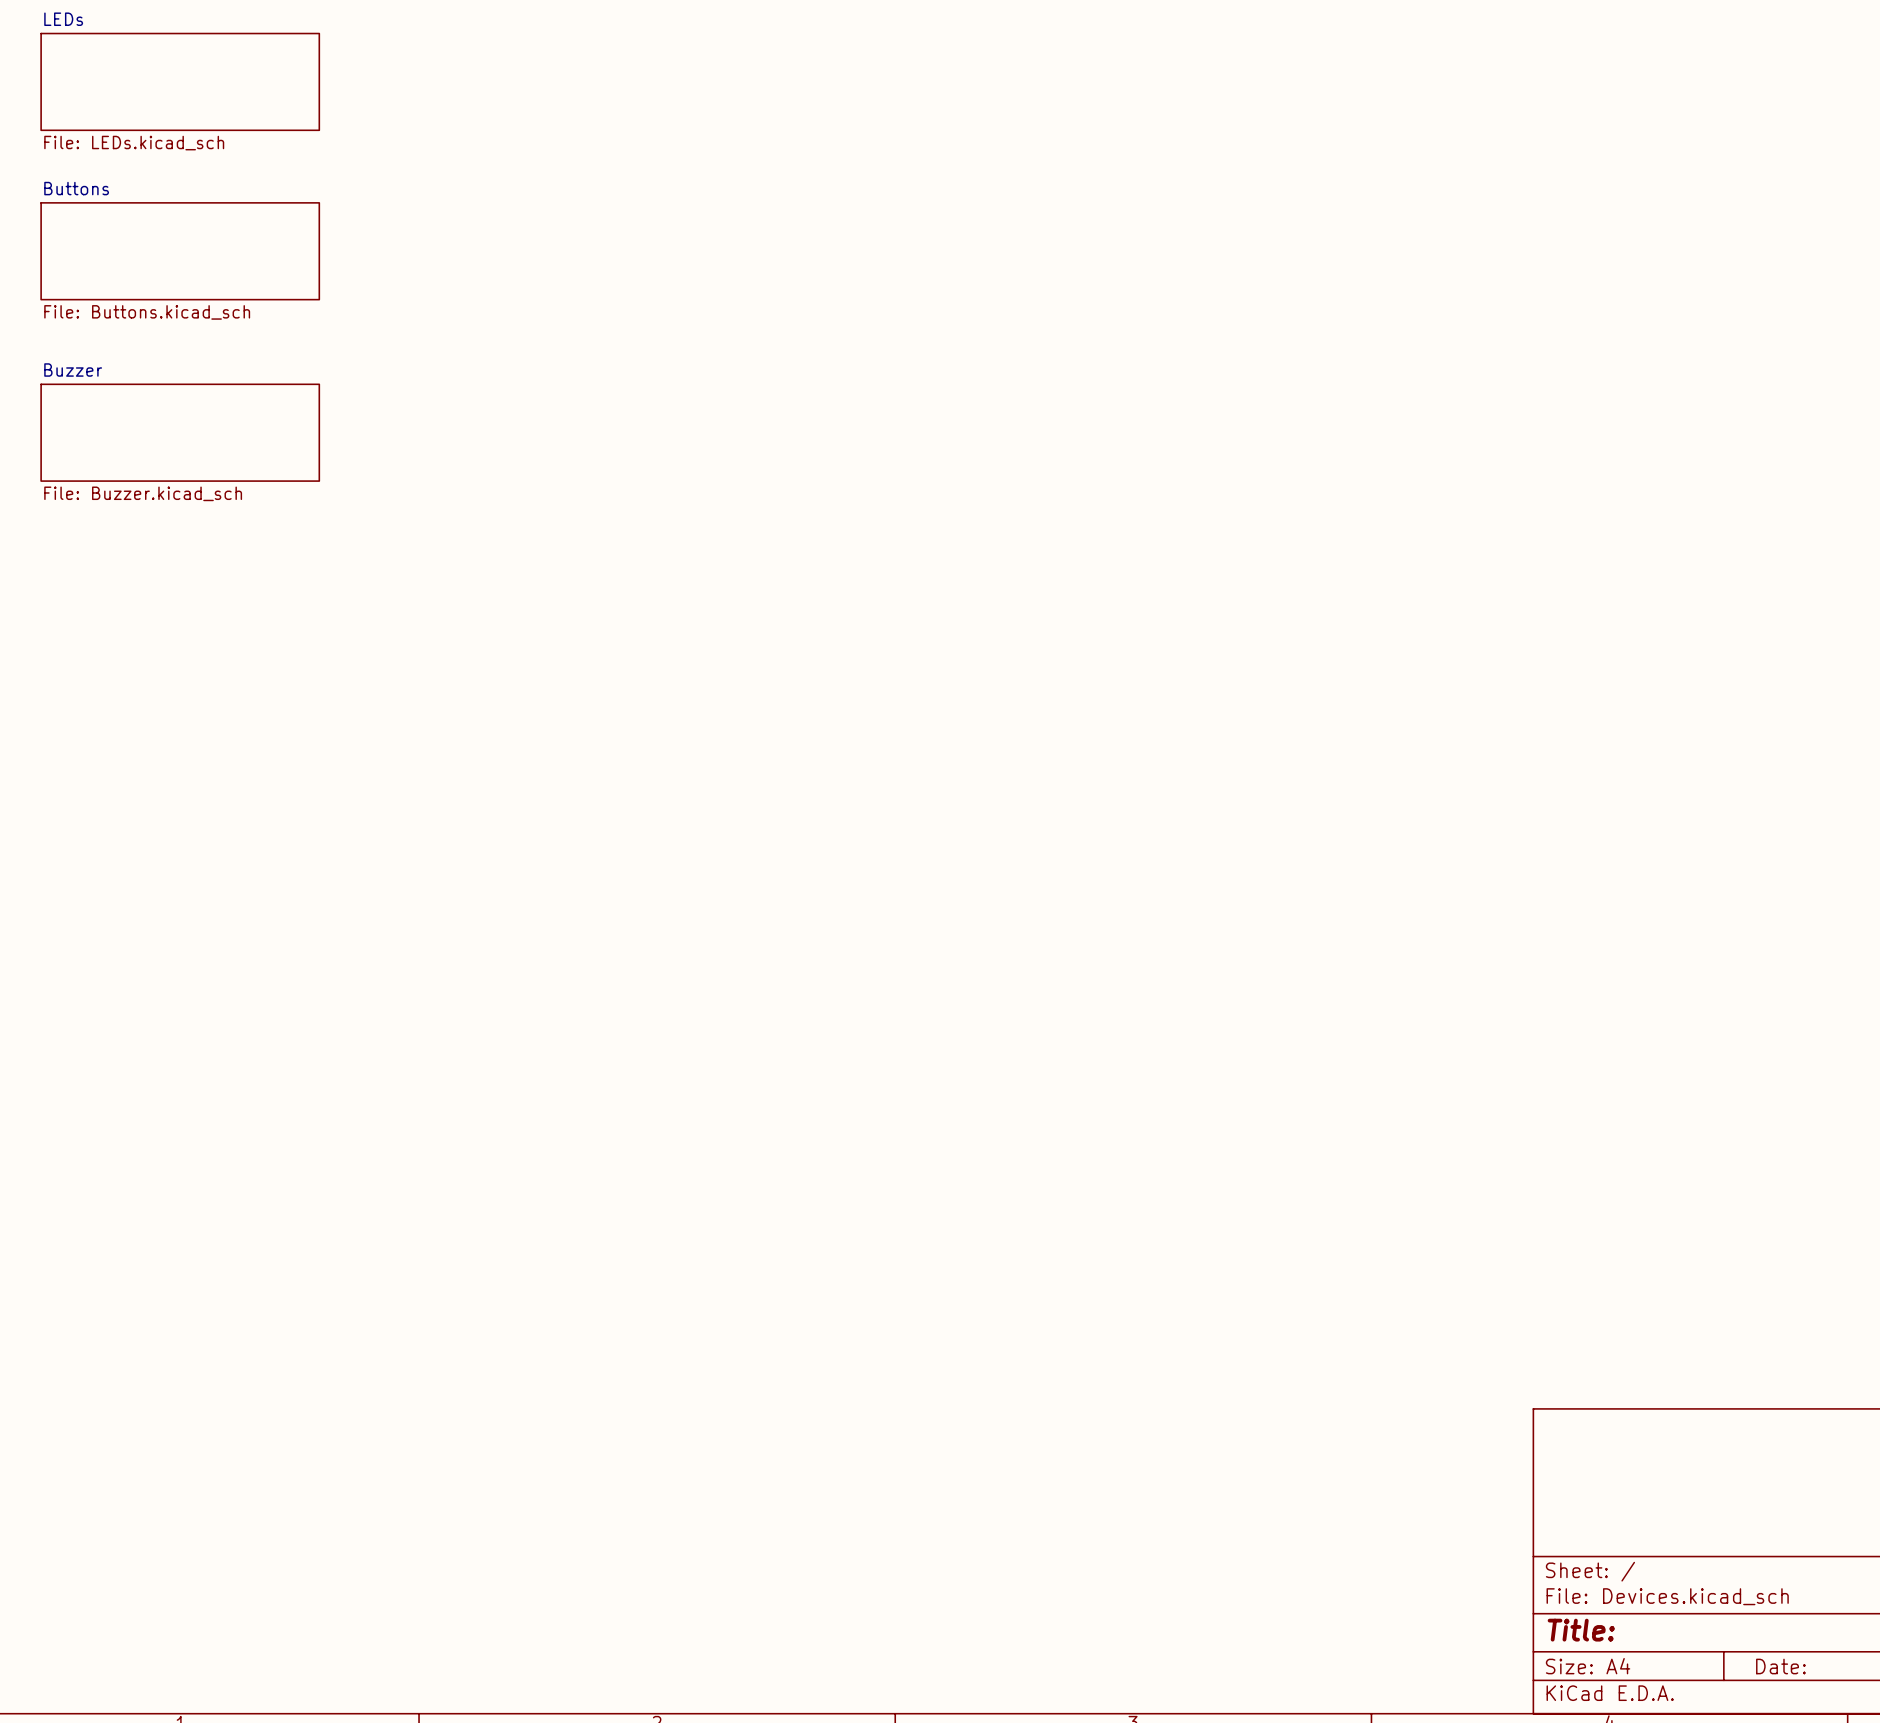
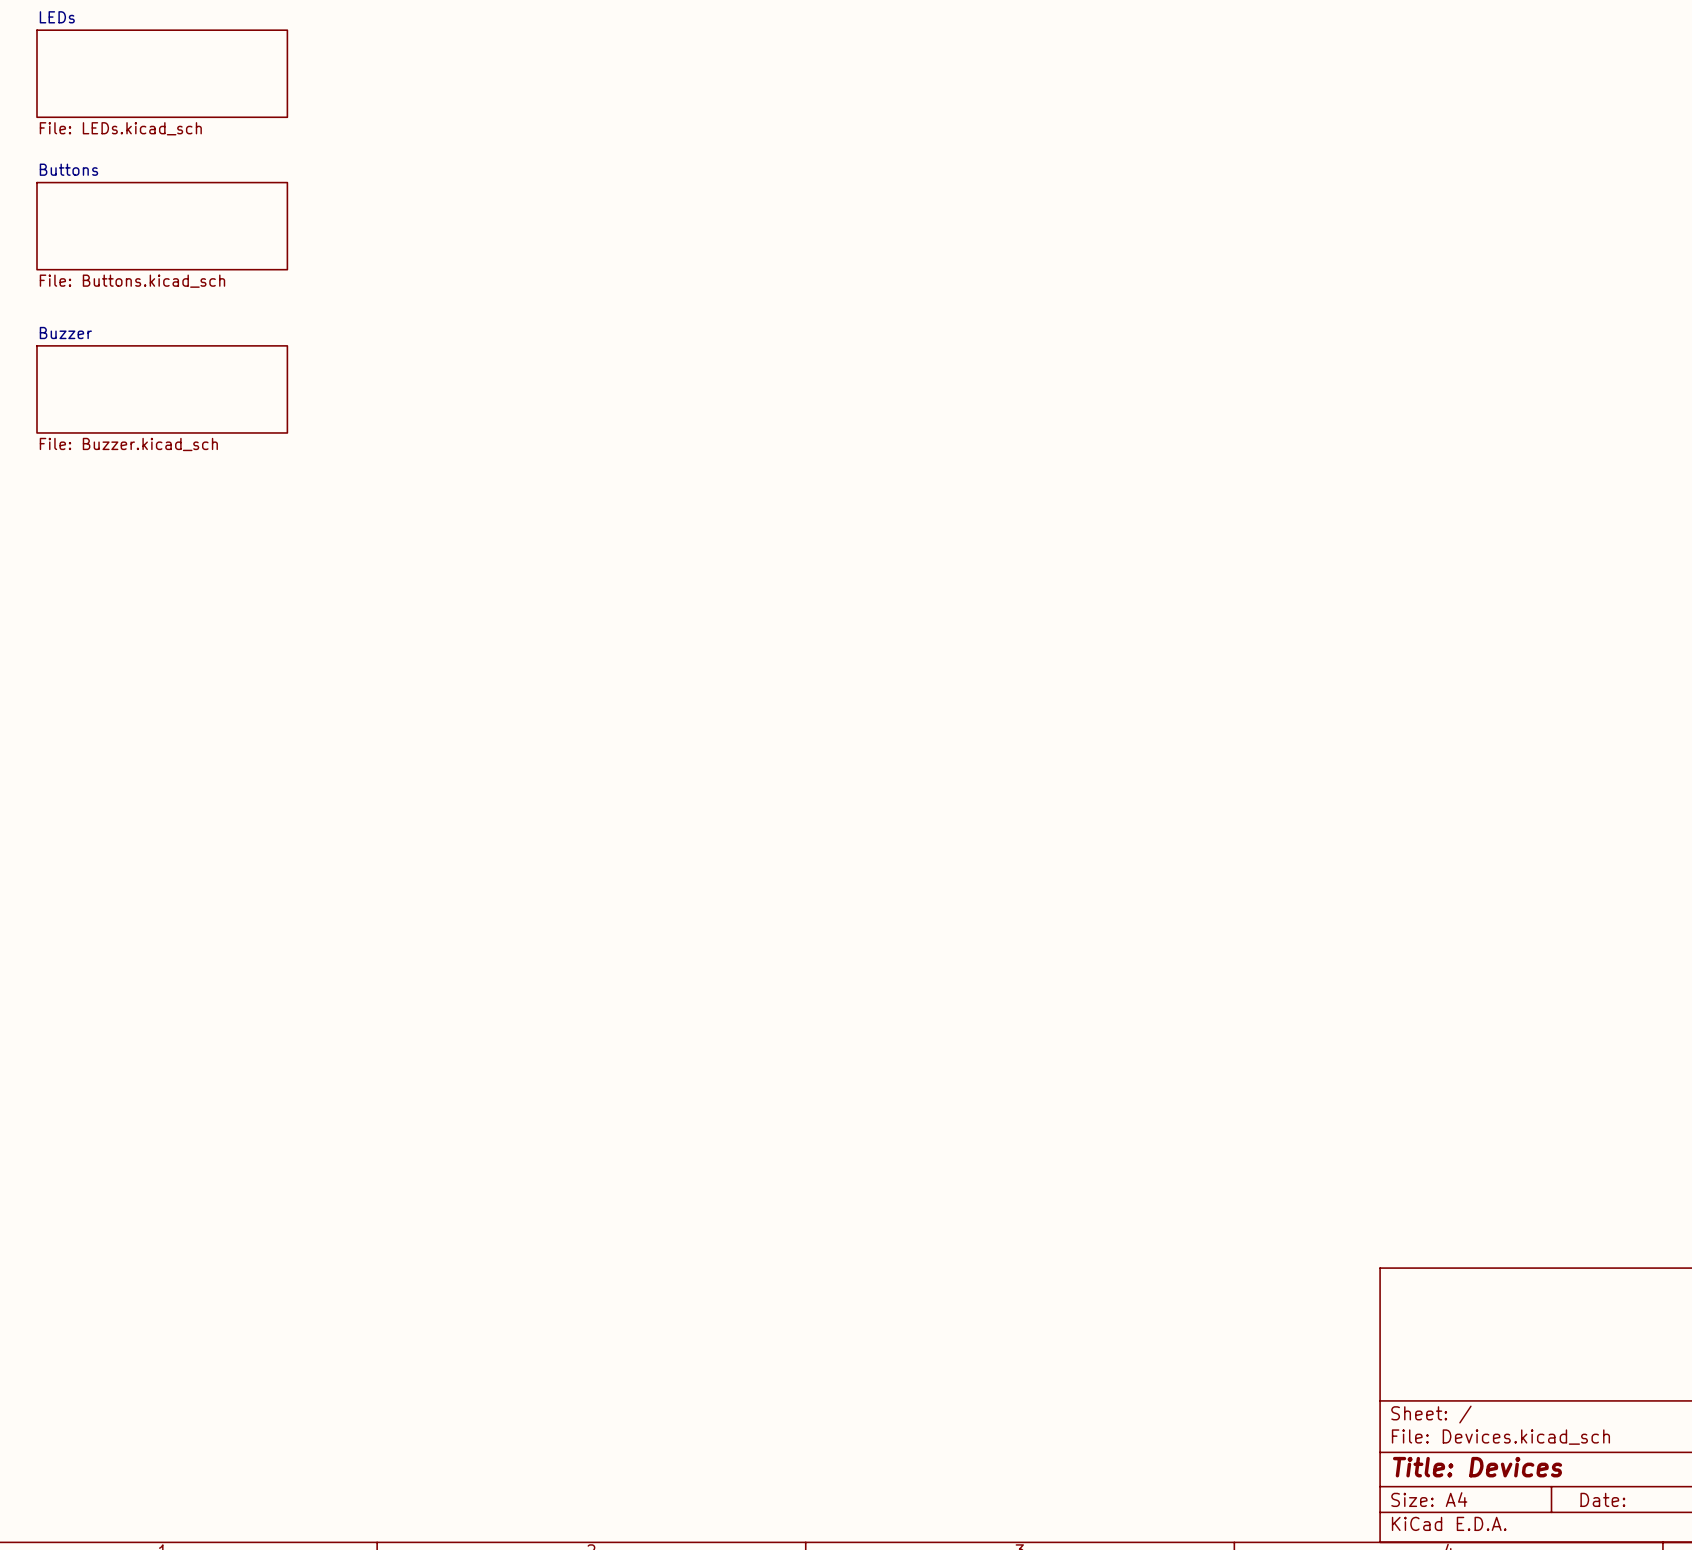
title block: Title: (1581, 1630) -> Title: Devices (1477, 1467)

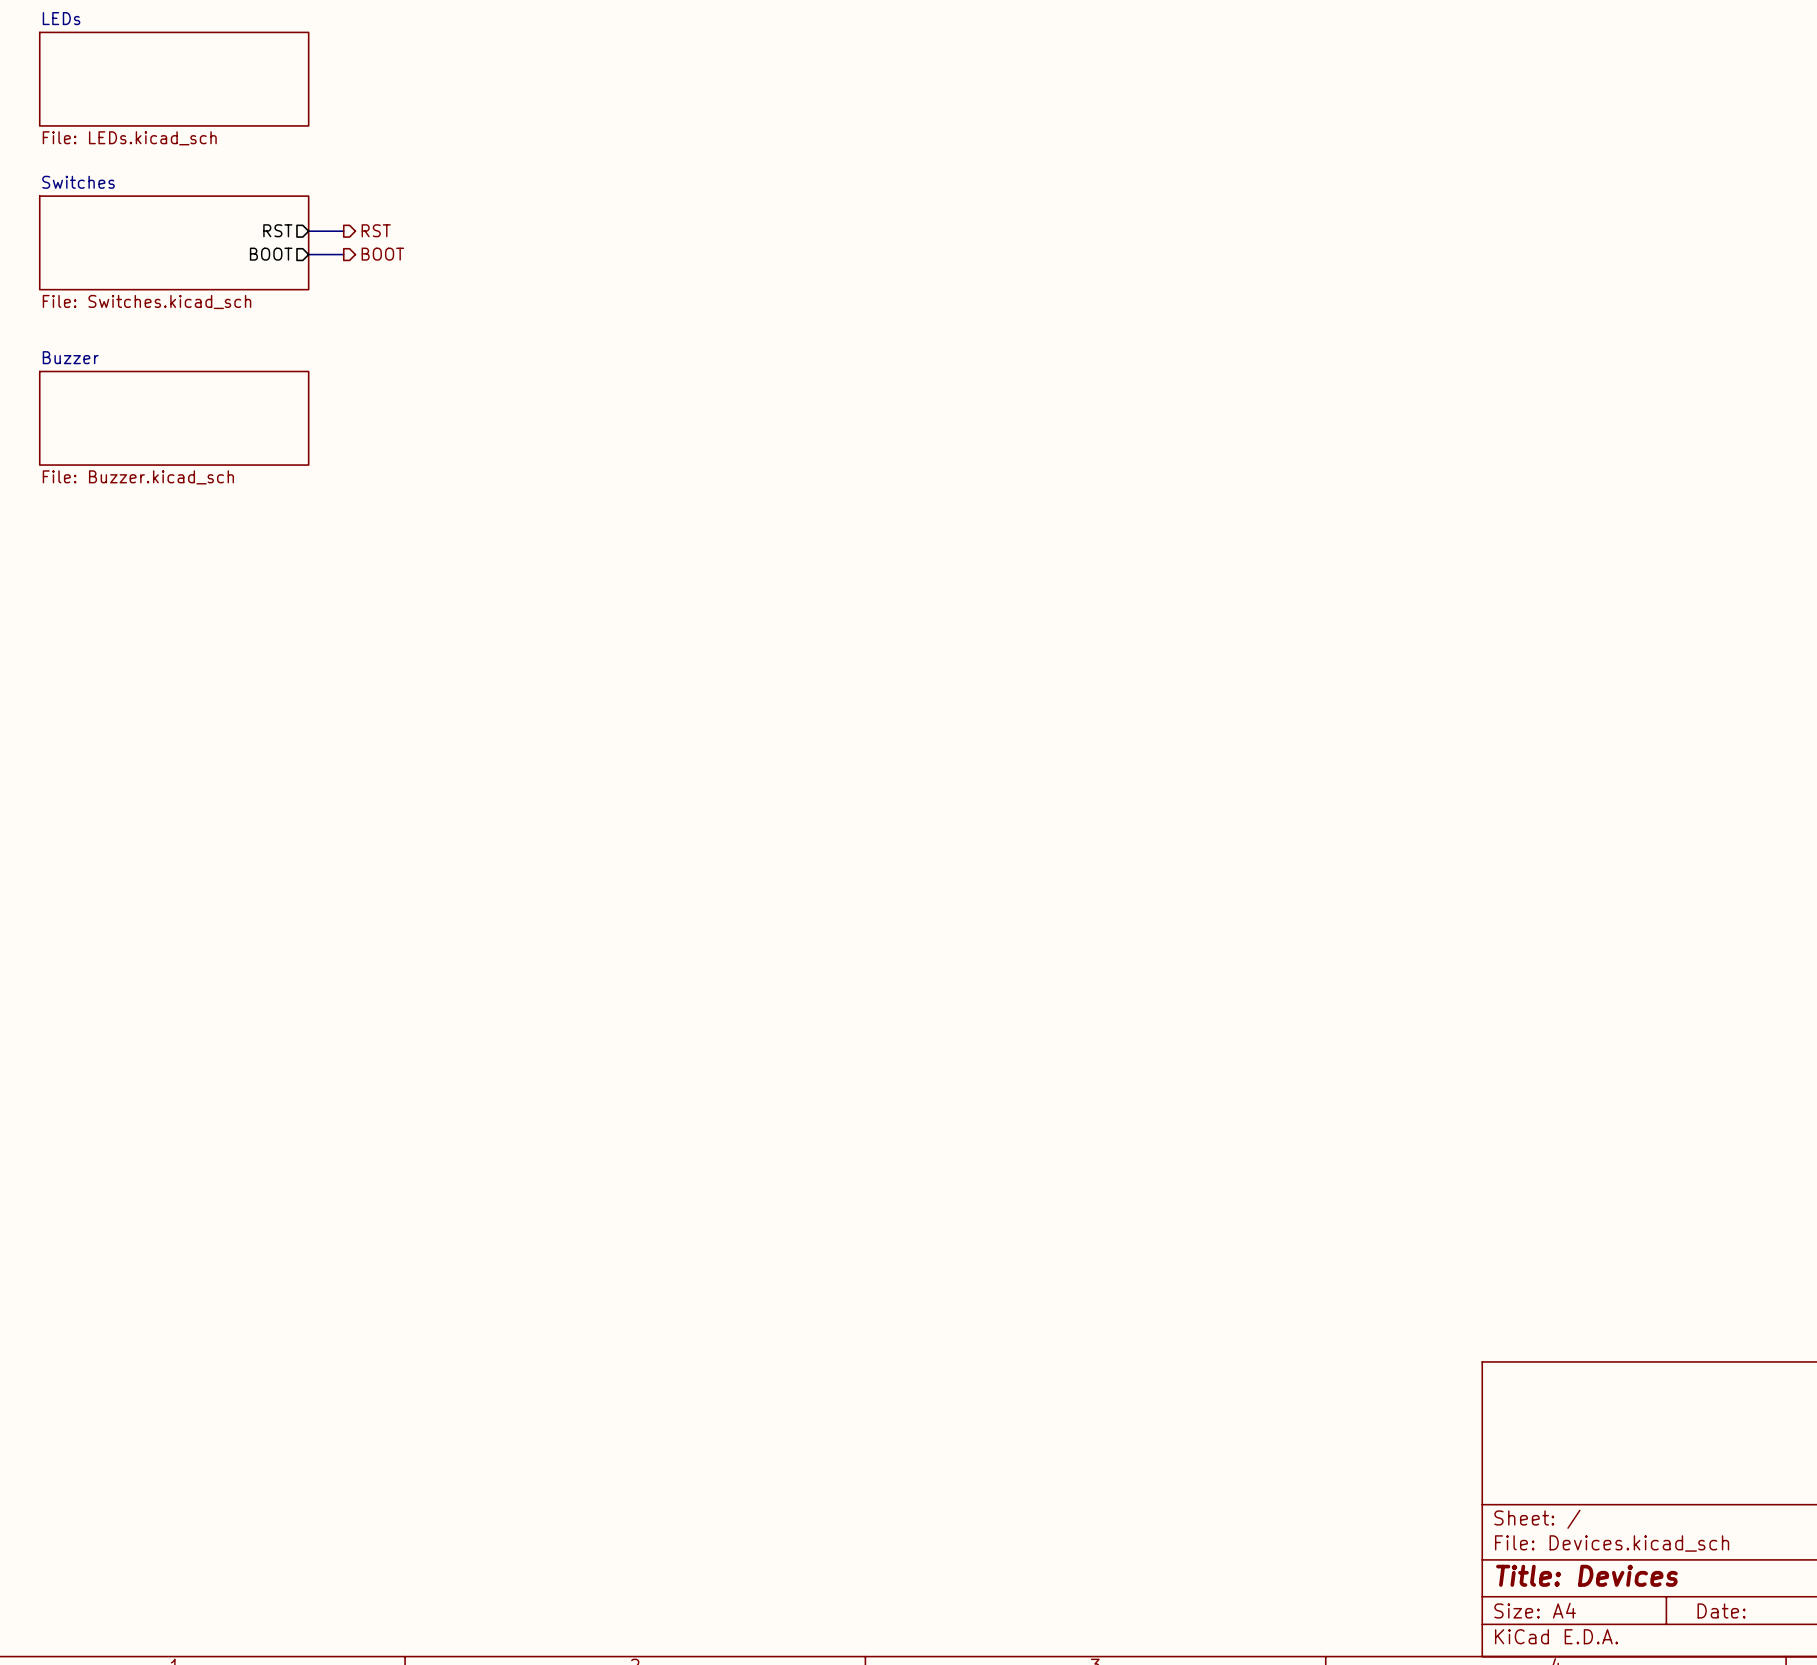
sheet Buttons name: Buttons (68, 169) -> Switches (78, 182)
sheet pin: none -> RST (277, 230)
hierarchical label: none -> RST (376, 230)
wire: none -> (308, 231) (343, 231)
sheet pin: none -> BOOT (271, 254)
hierarchical label: none -> BOOT (382, 254)
wire: none -> (308, 254) (343, 254)
sheet Buttons value: File: Buttons.kicad_sch (132, 281) -> File: Switches.kicad_sch (147, 301)

